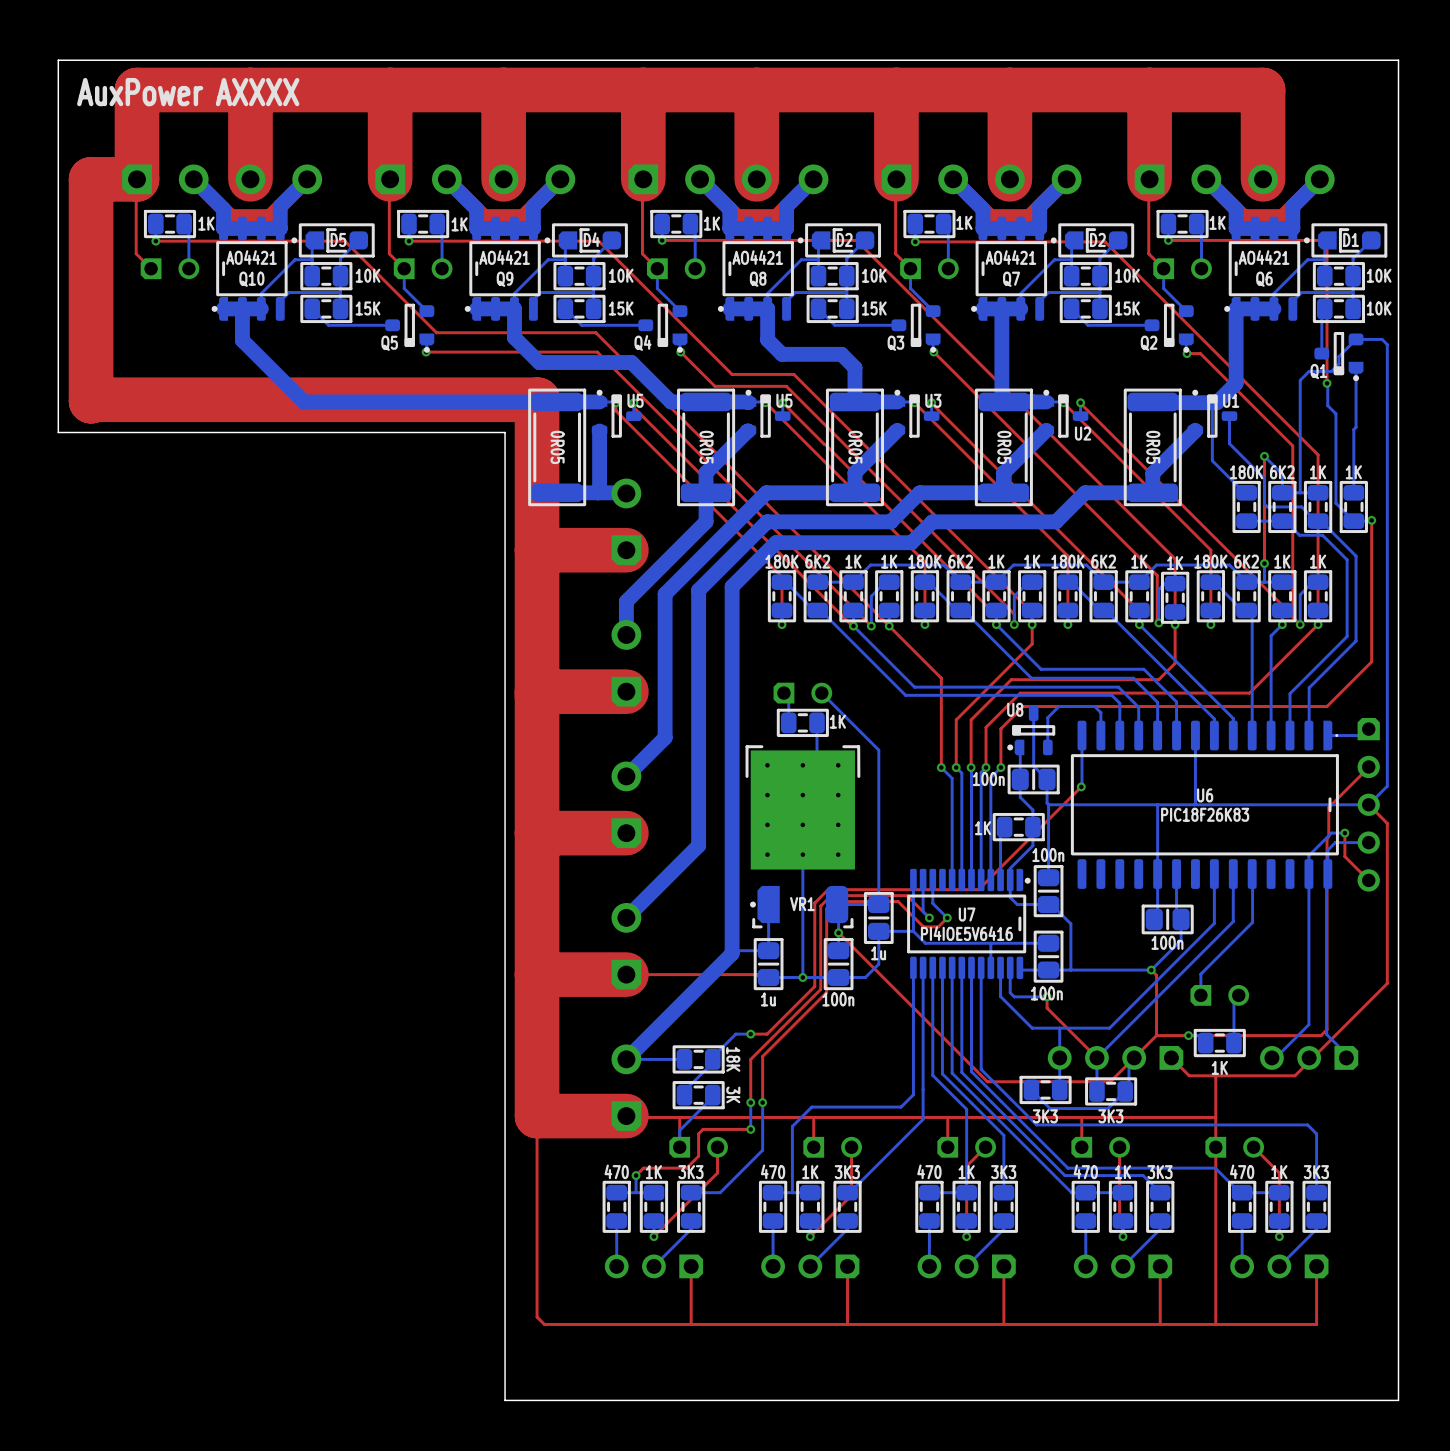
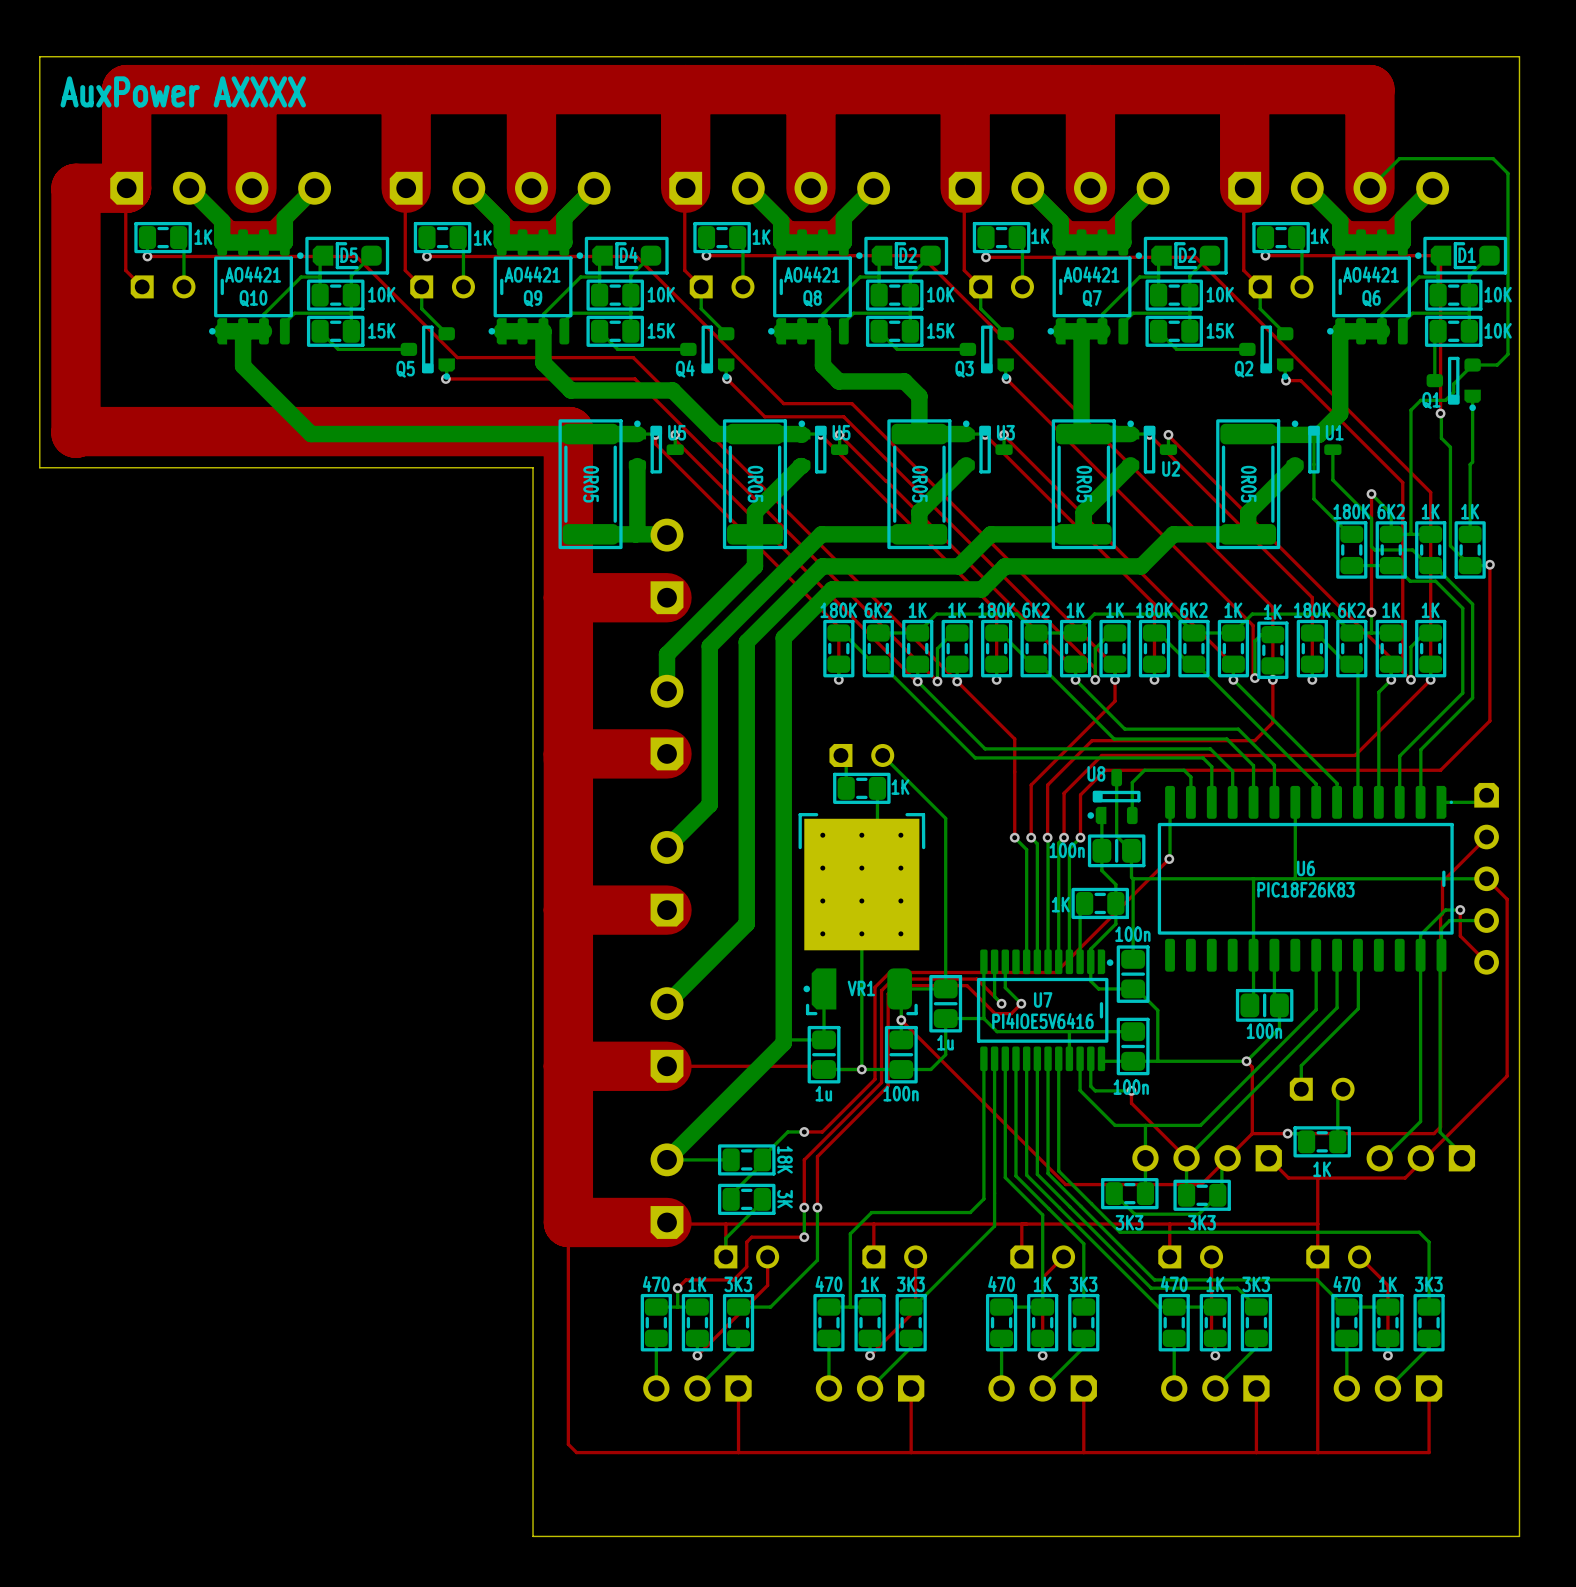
bottom track: (1378, 339) (1382, 339) (1387, 344) (1387, 786) (1368, 804) -> (1497, 365) (1507, 354) (1507, 173) (1493, 158) (1399, 158) (1369, 188)

